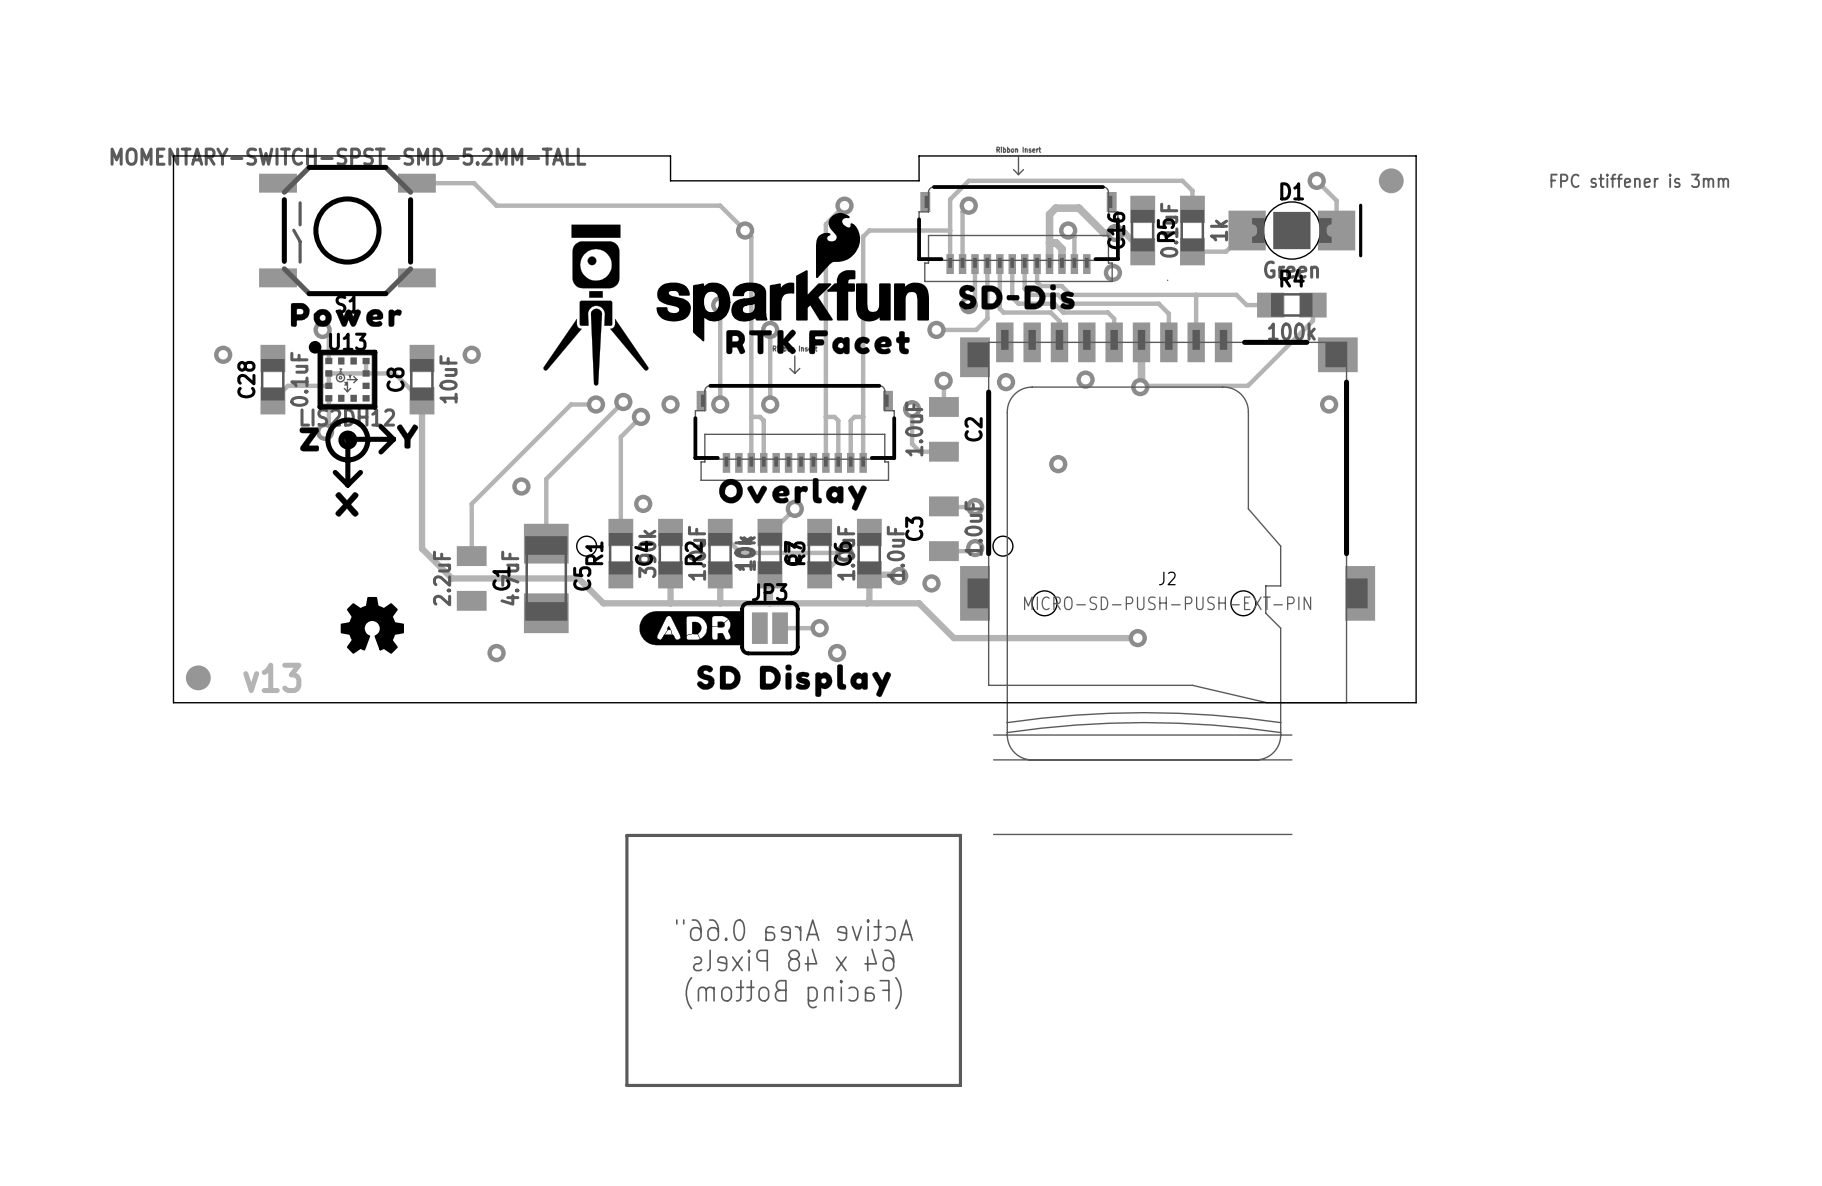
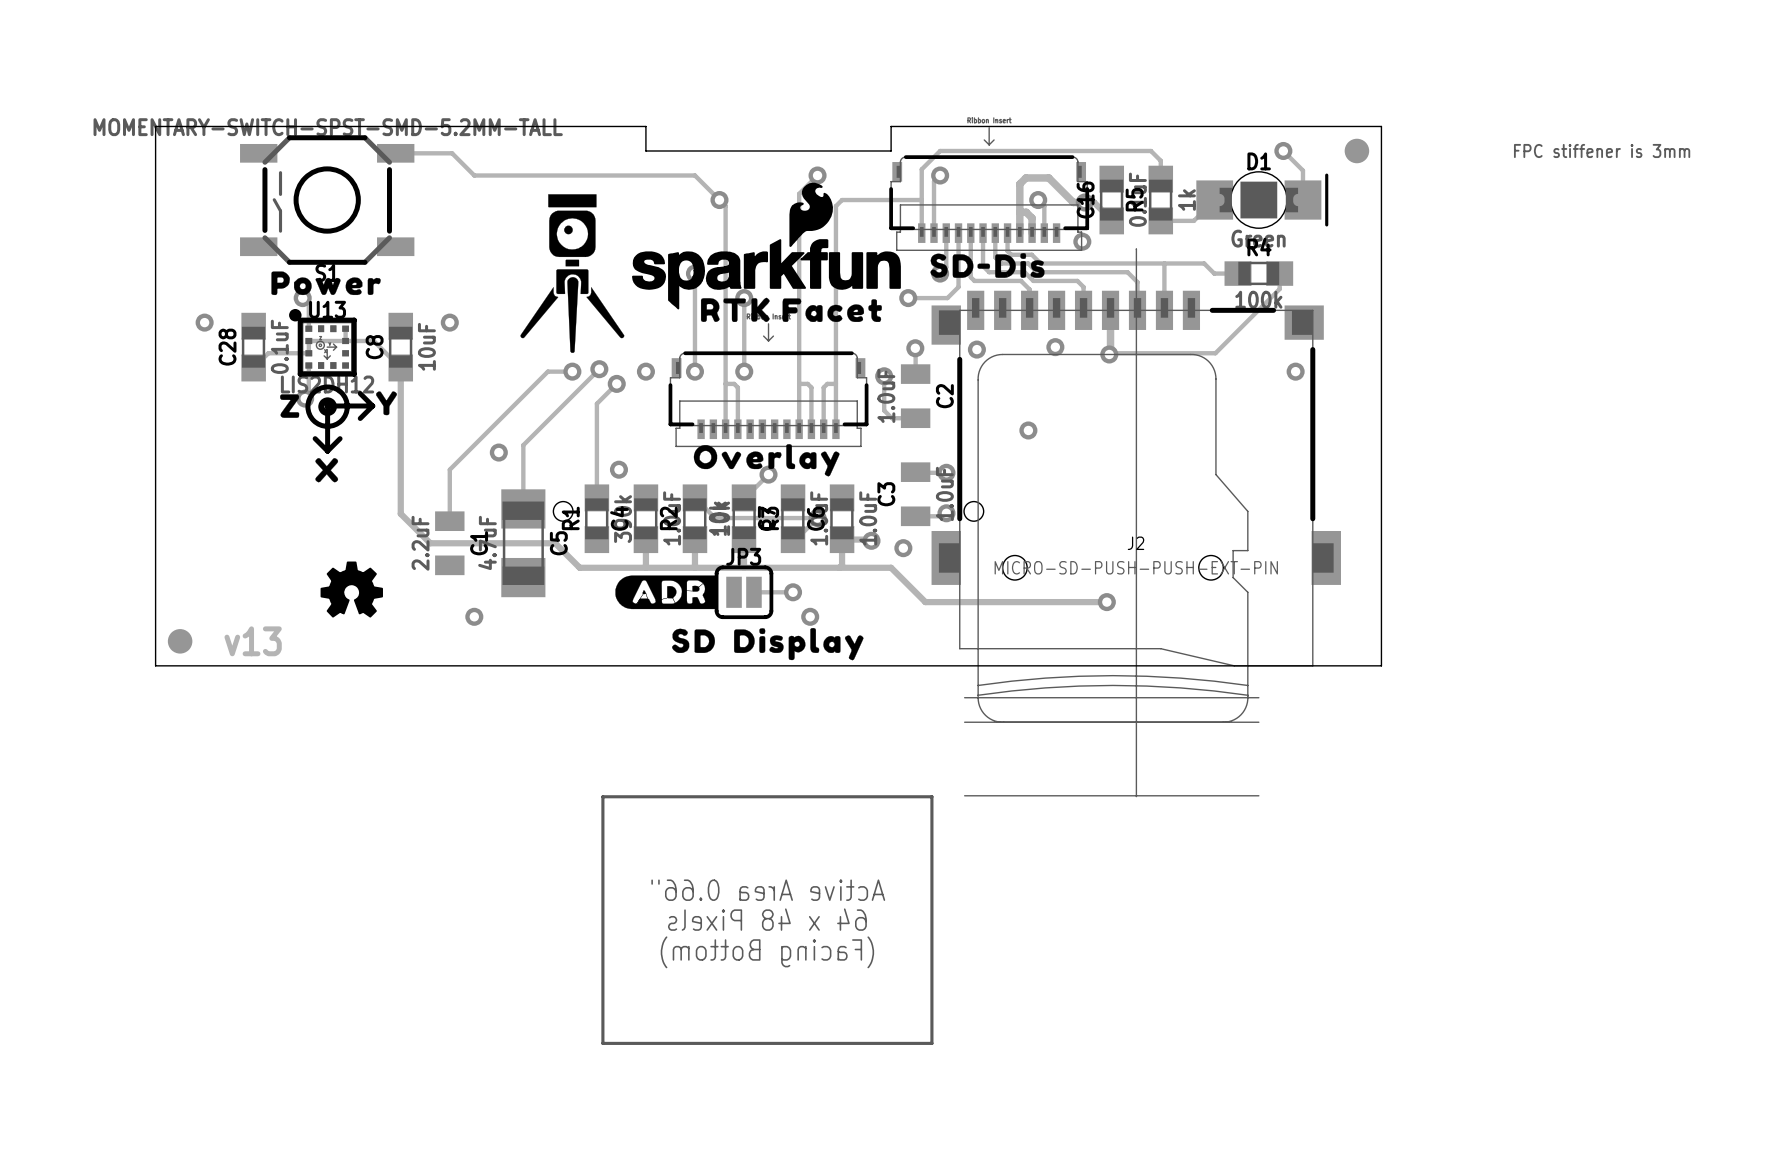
line: none -> (1136, 249) (1136, 796)

